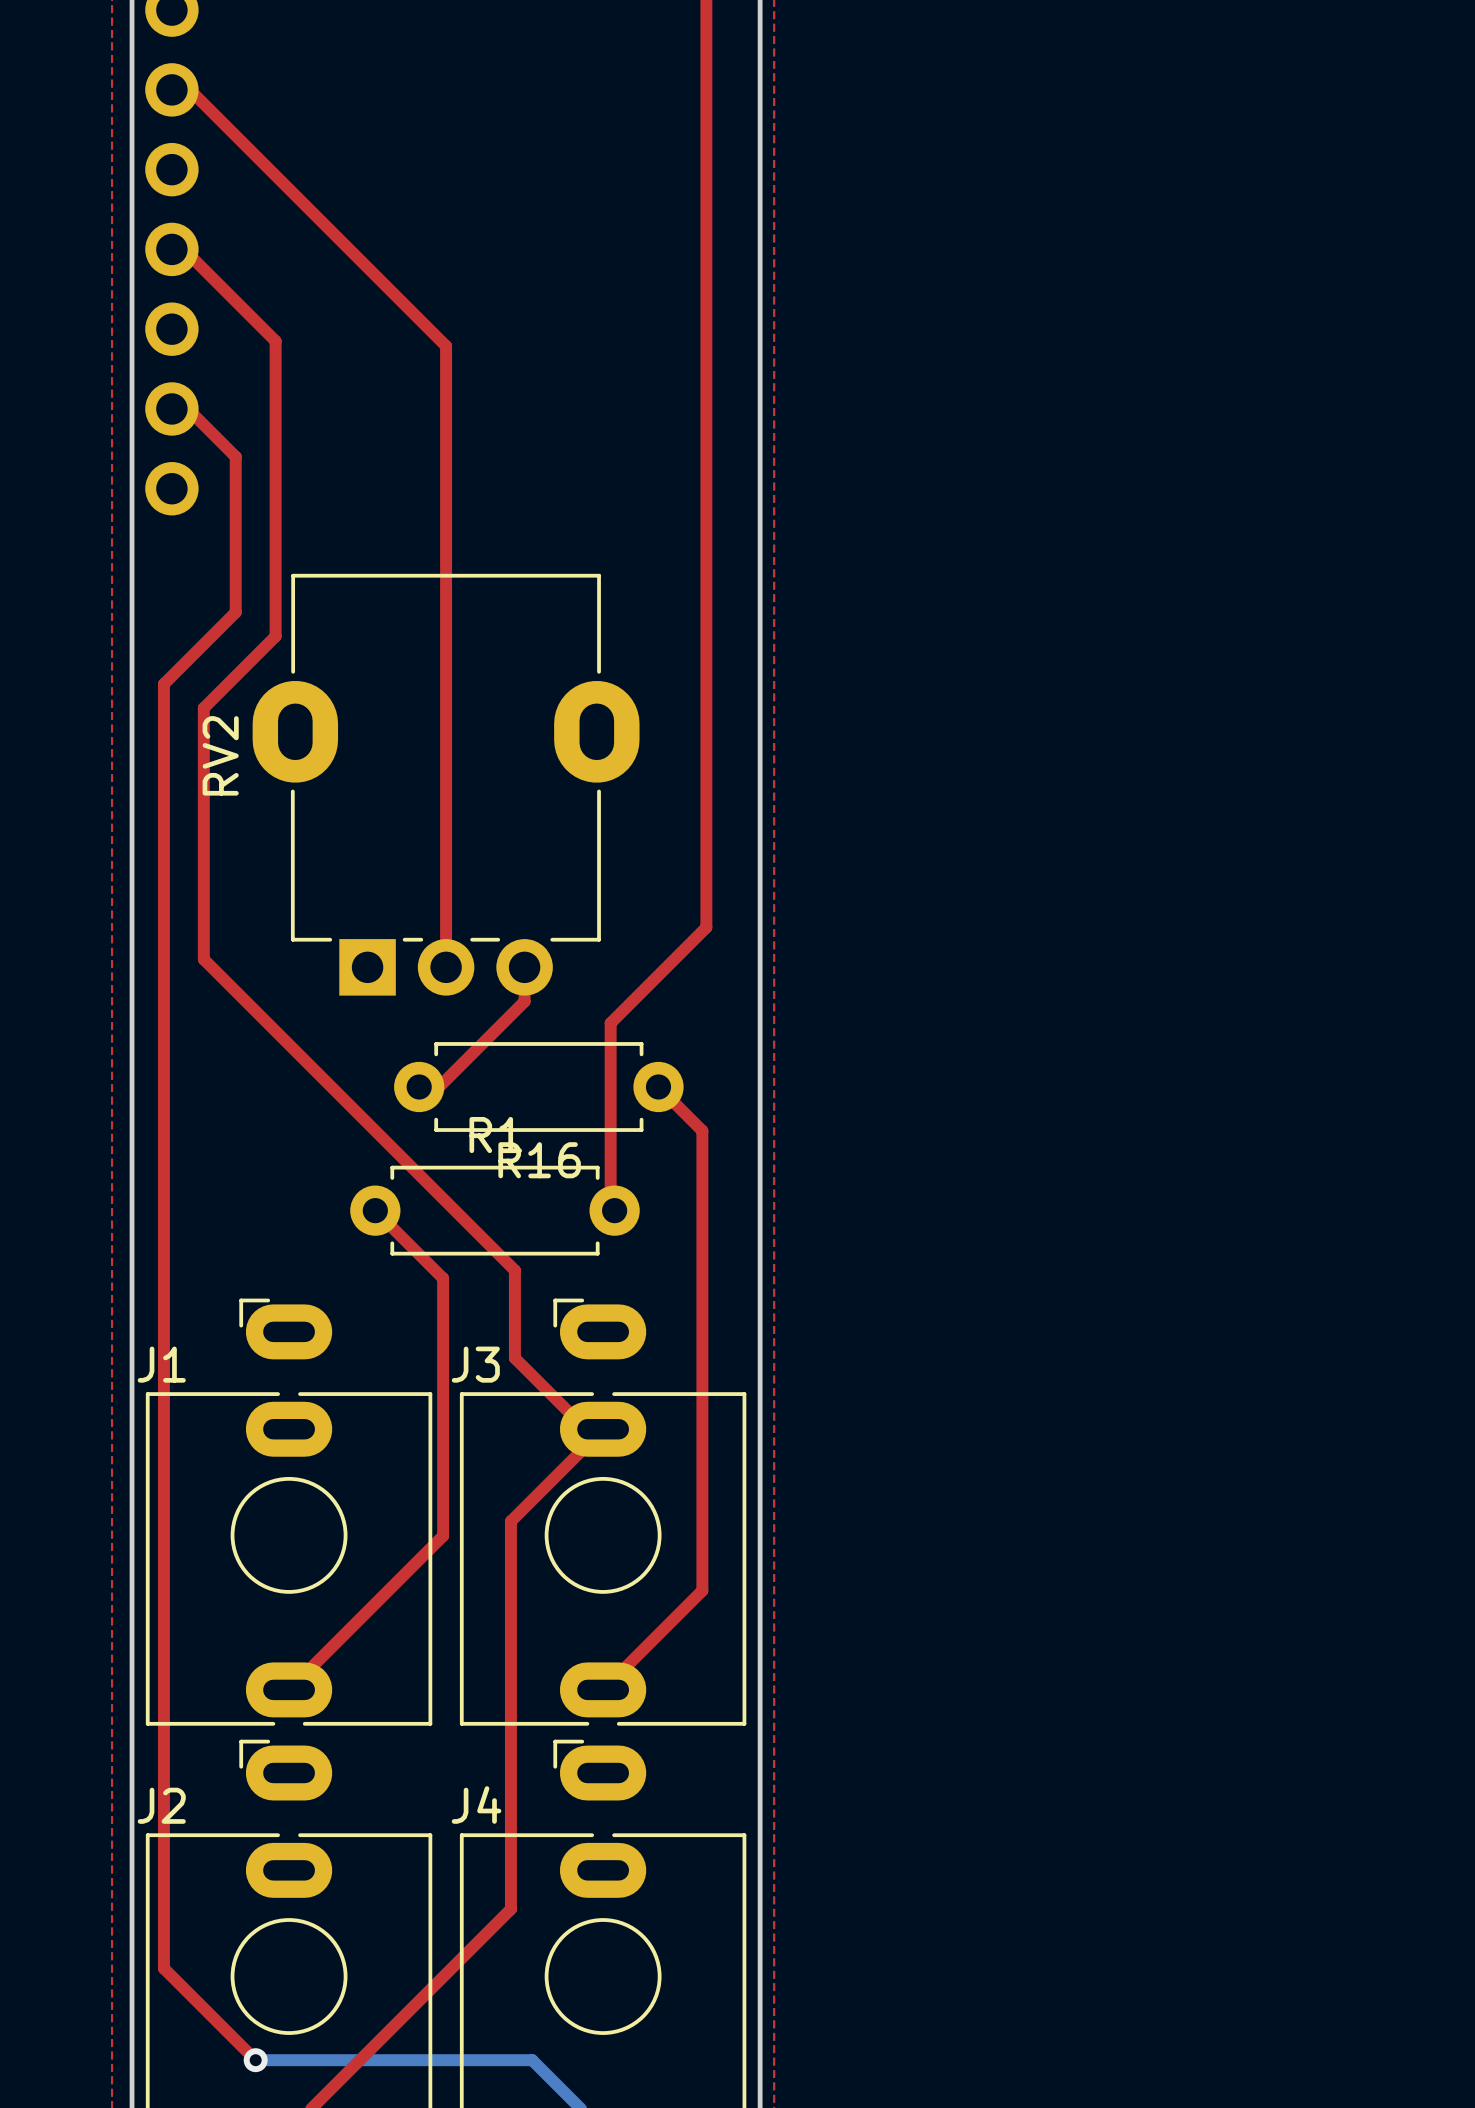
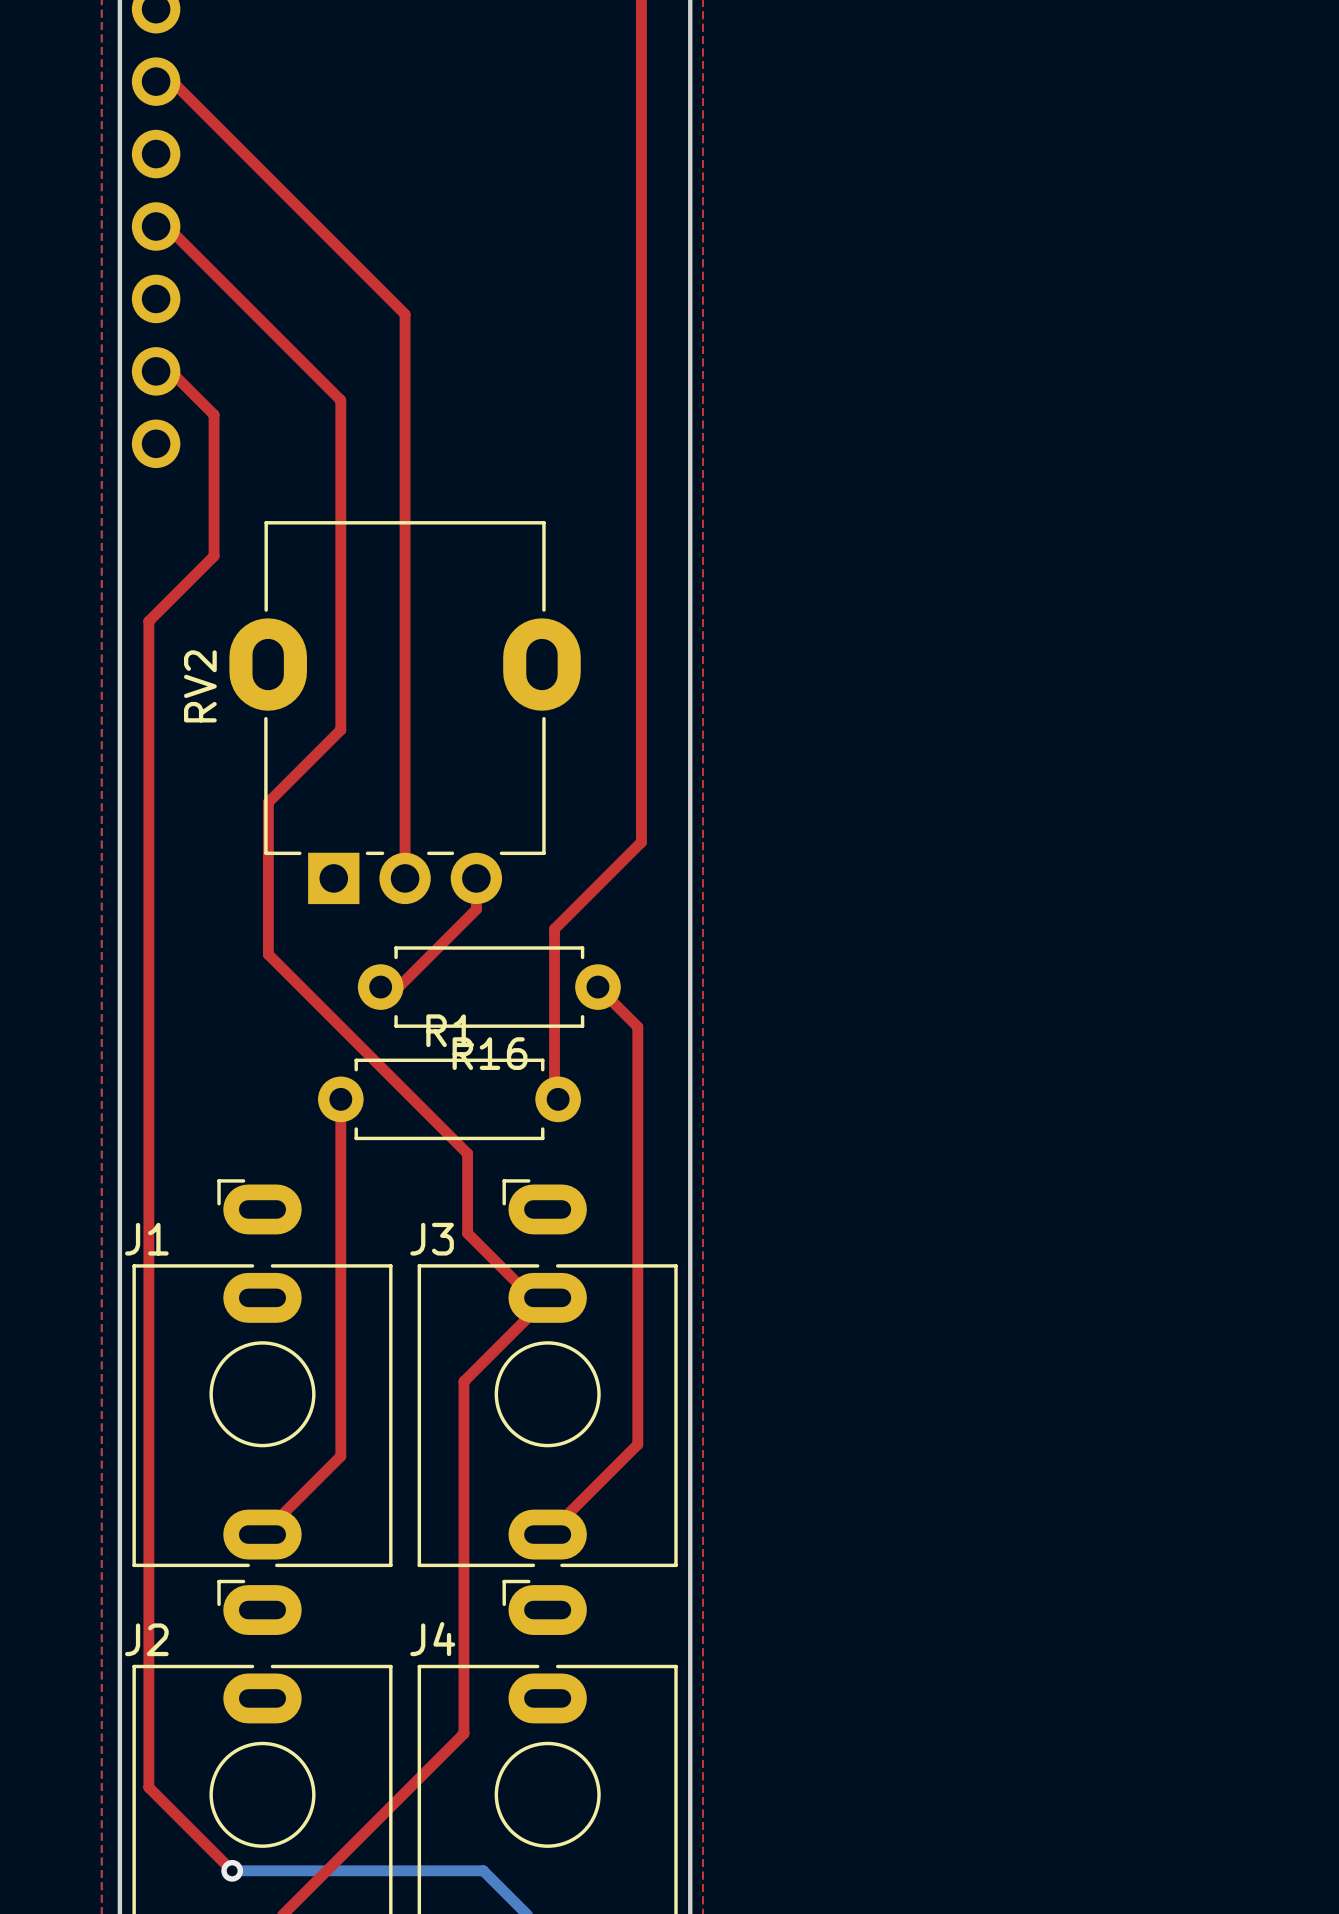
top track: (275, 341) (275, 636) (203, 708) (203, 959) (295, 1051) -> (250, 309) (340, 400) (340, 729) (268, 802) (268, 954)
top track: (375, 1210) (443, 1278) (443, 1535) (375, 1603) -> (340, 1099) (340, 1456)

